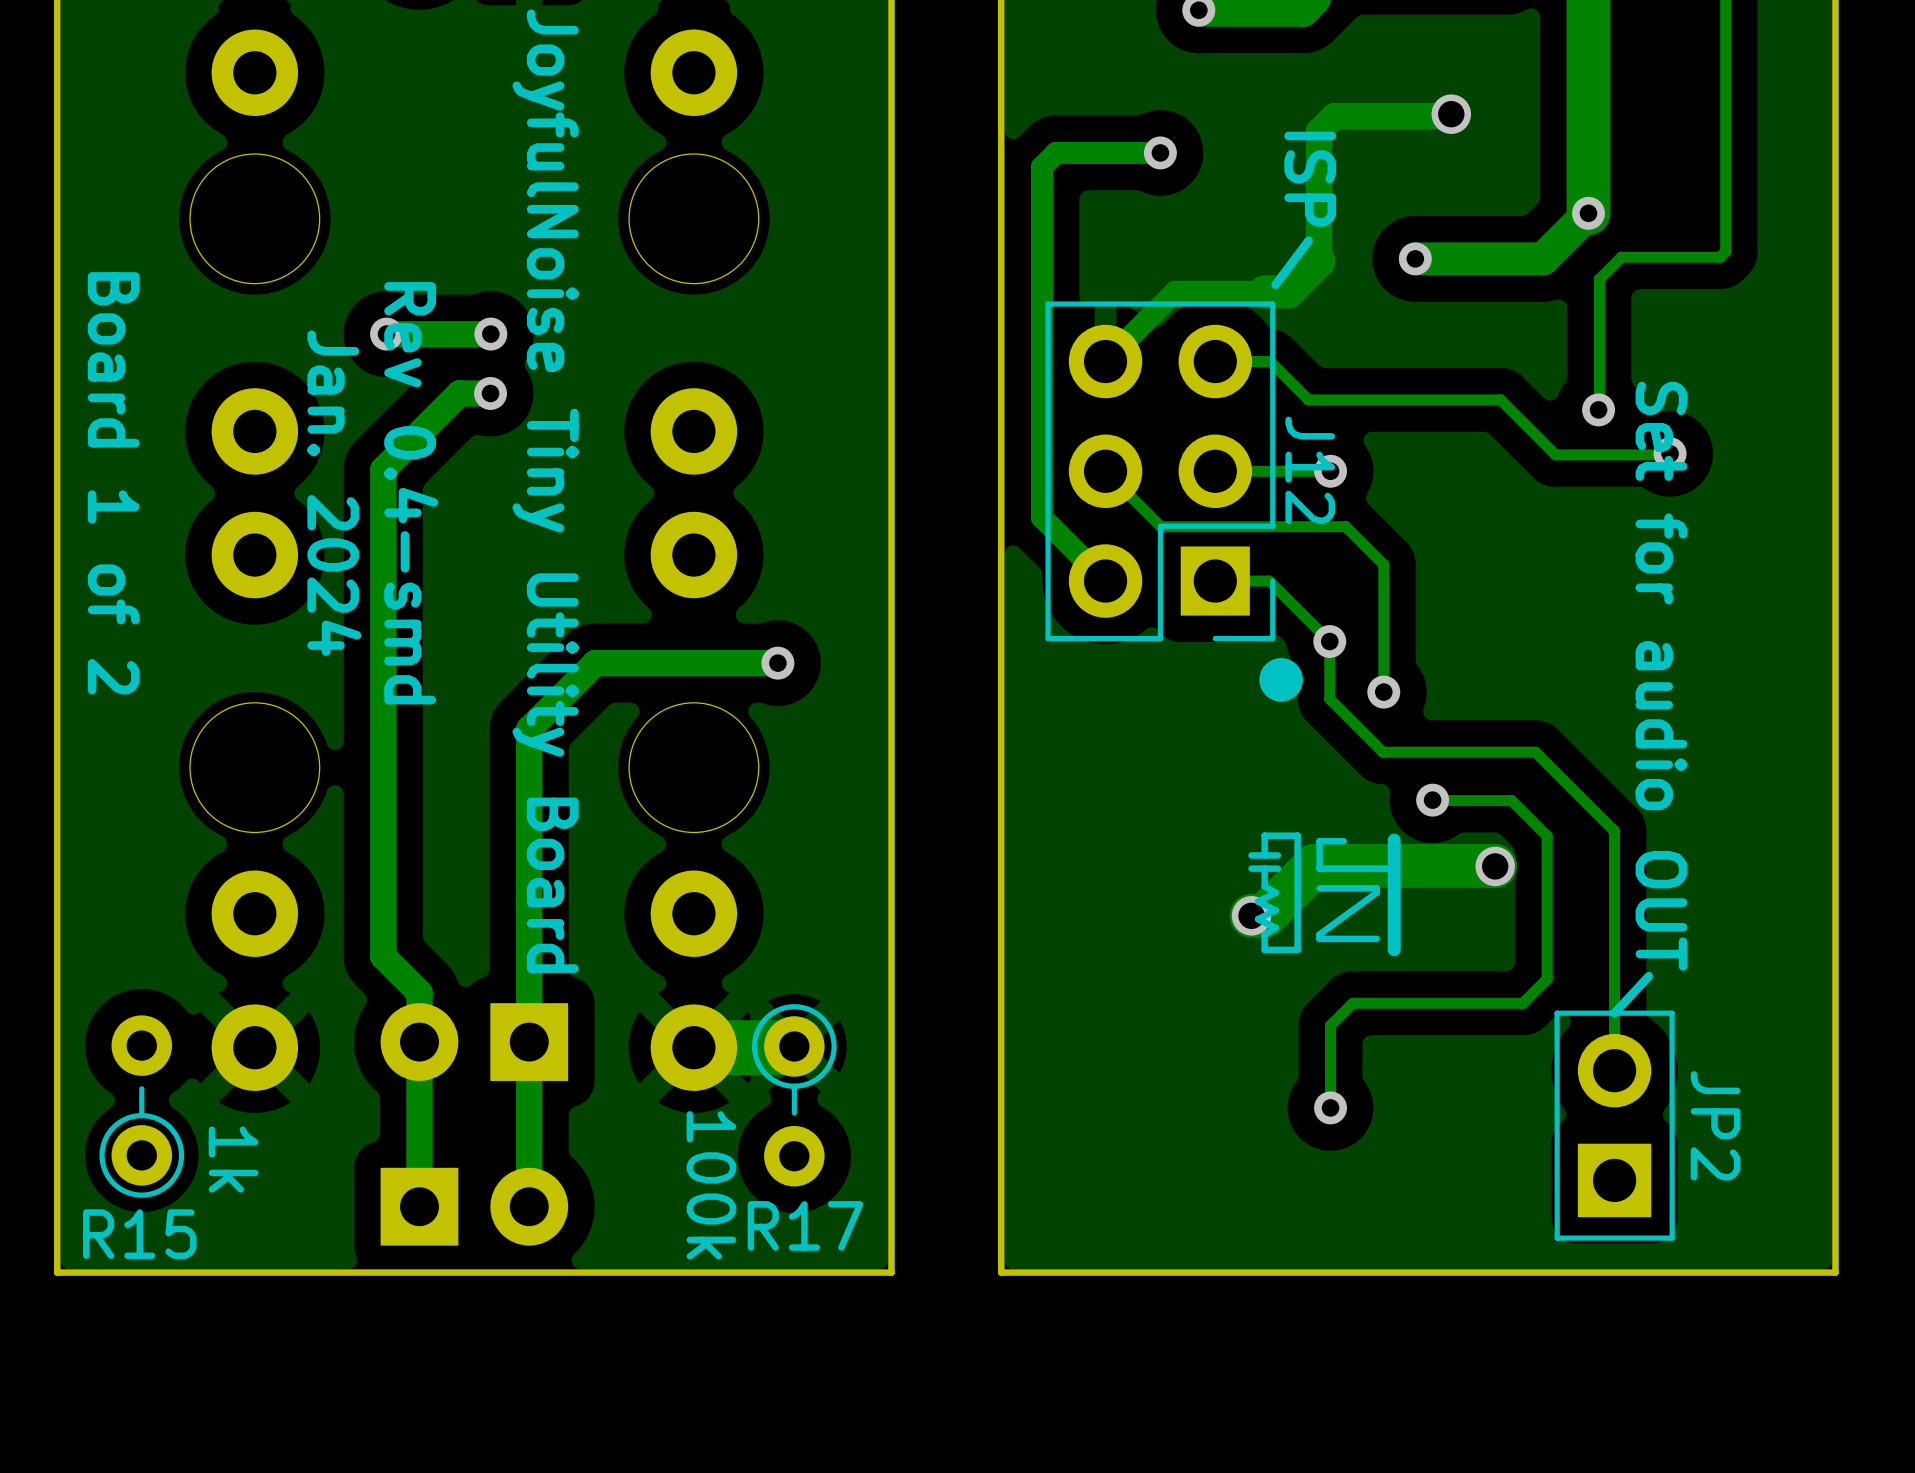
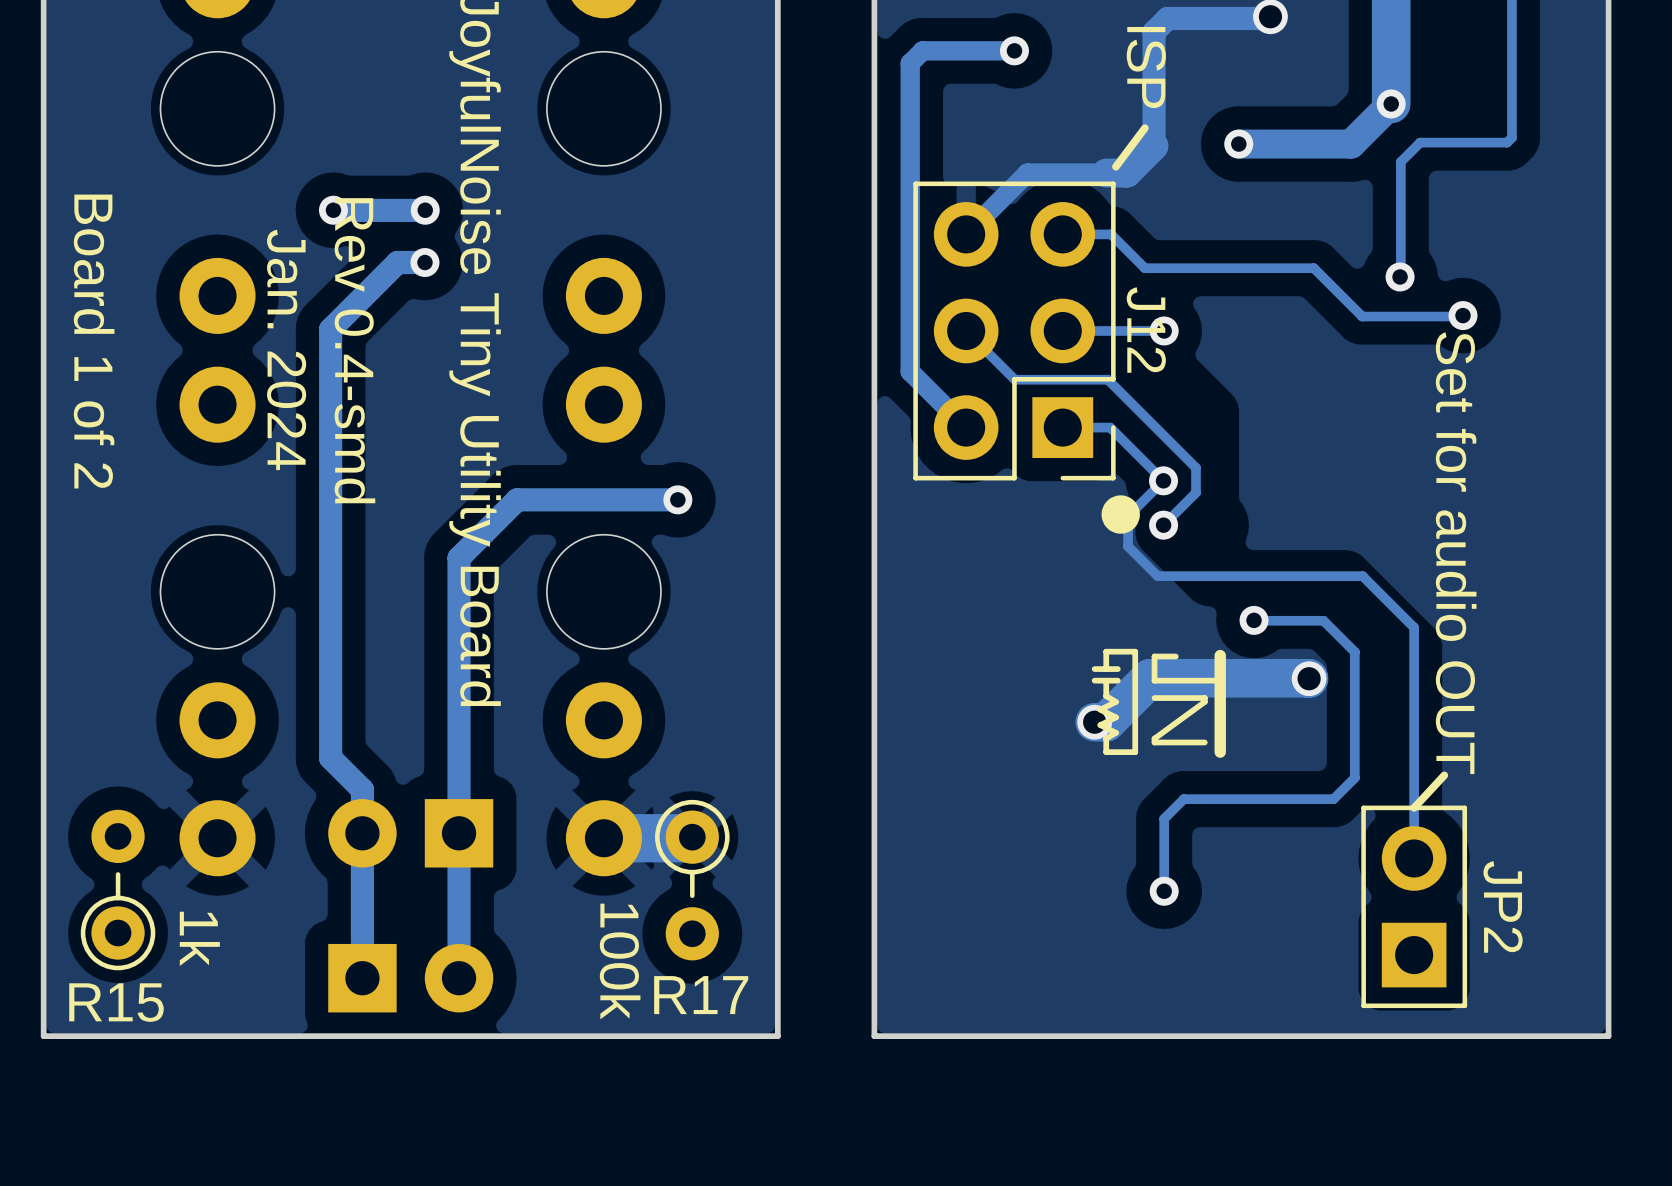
track: (1266, 526) (1345, 526) (1383, 564) (1383, 692) -> (1107, 379) (1195, 467) (1195, 492) (1163, 525)
track: (1329, 641) (1329, 699) (1382, 752) (1535, 752) (1614, 831) -> (1163, 480) (1128, 516) (1128, 546) (1157, 576) (1362, 576) (1414, 627) (1414, 647)
via position: (1383, 692) -> (1163, 525)

